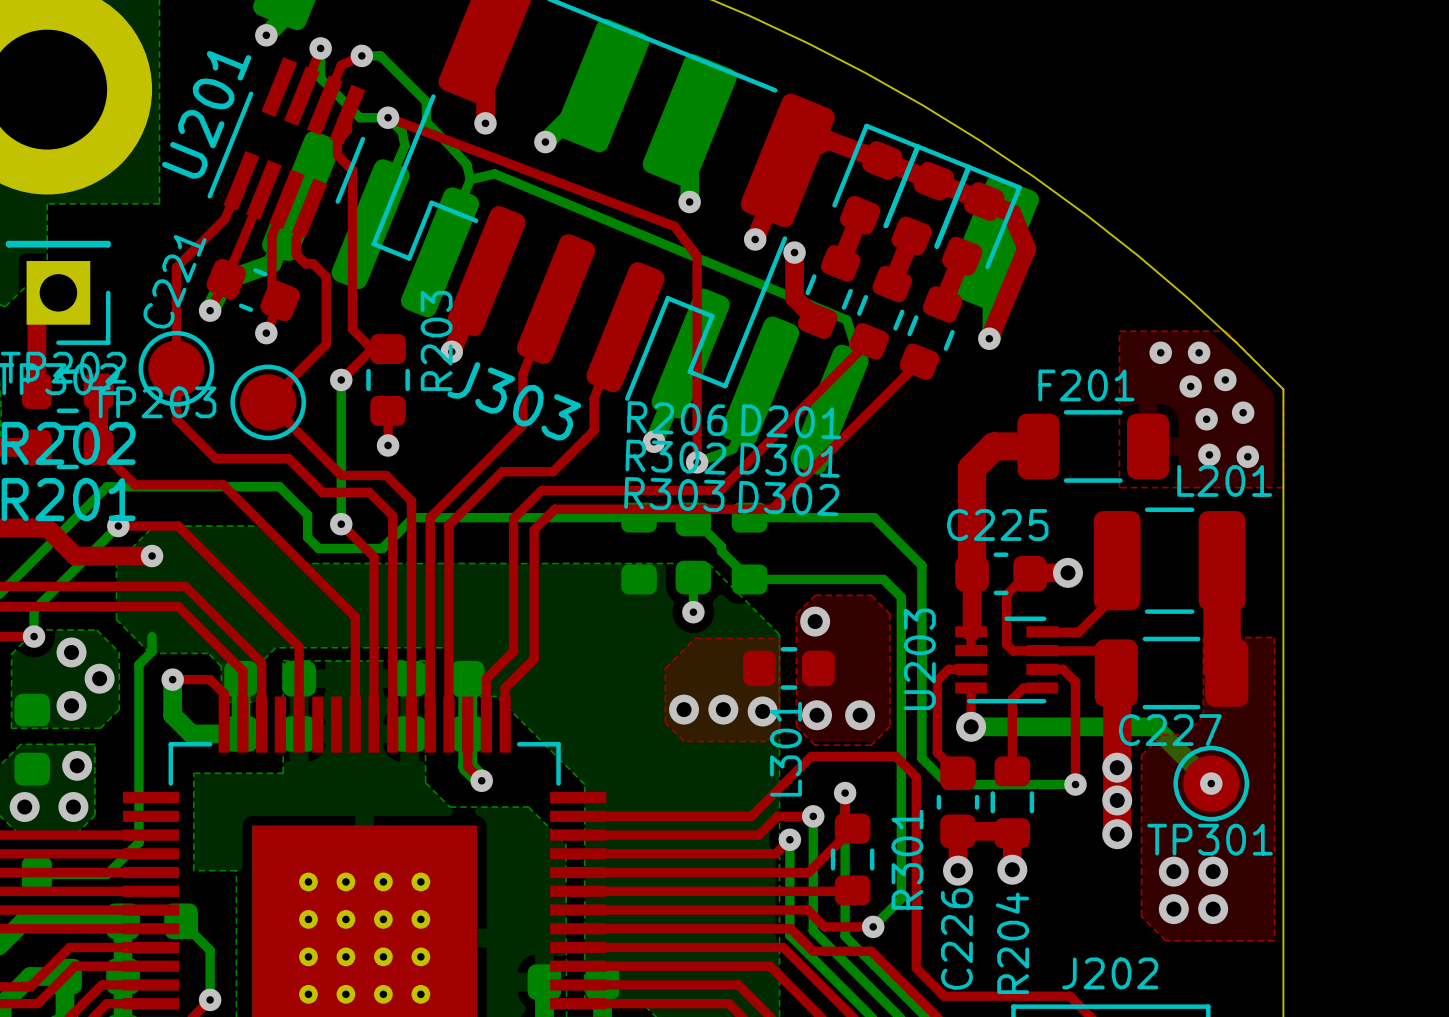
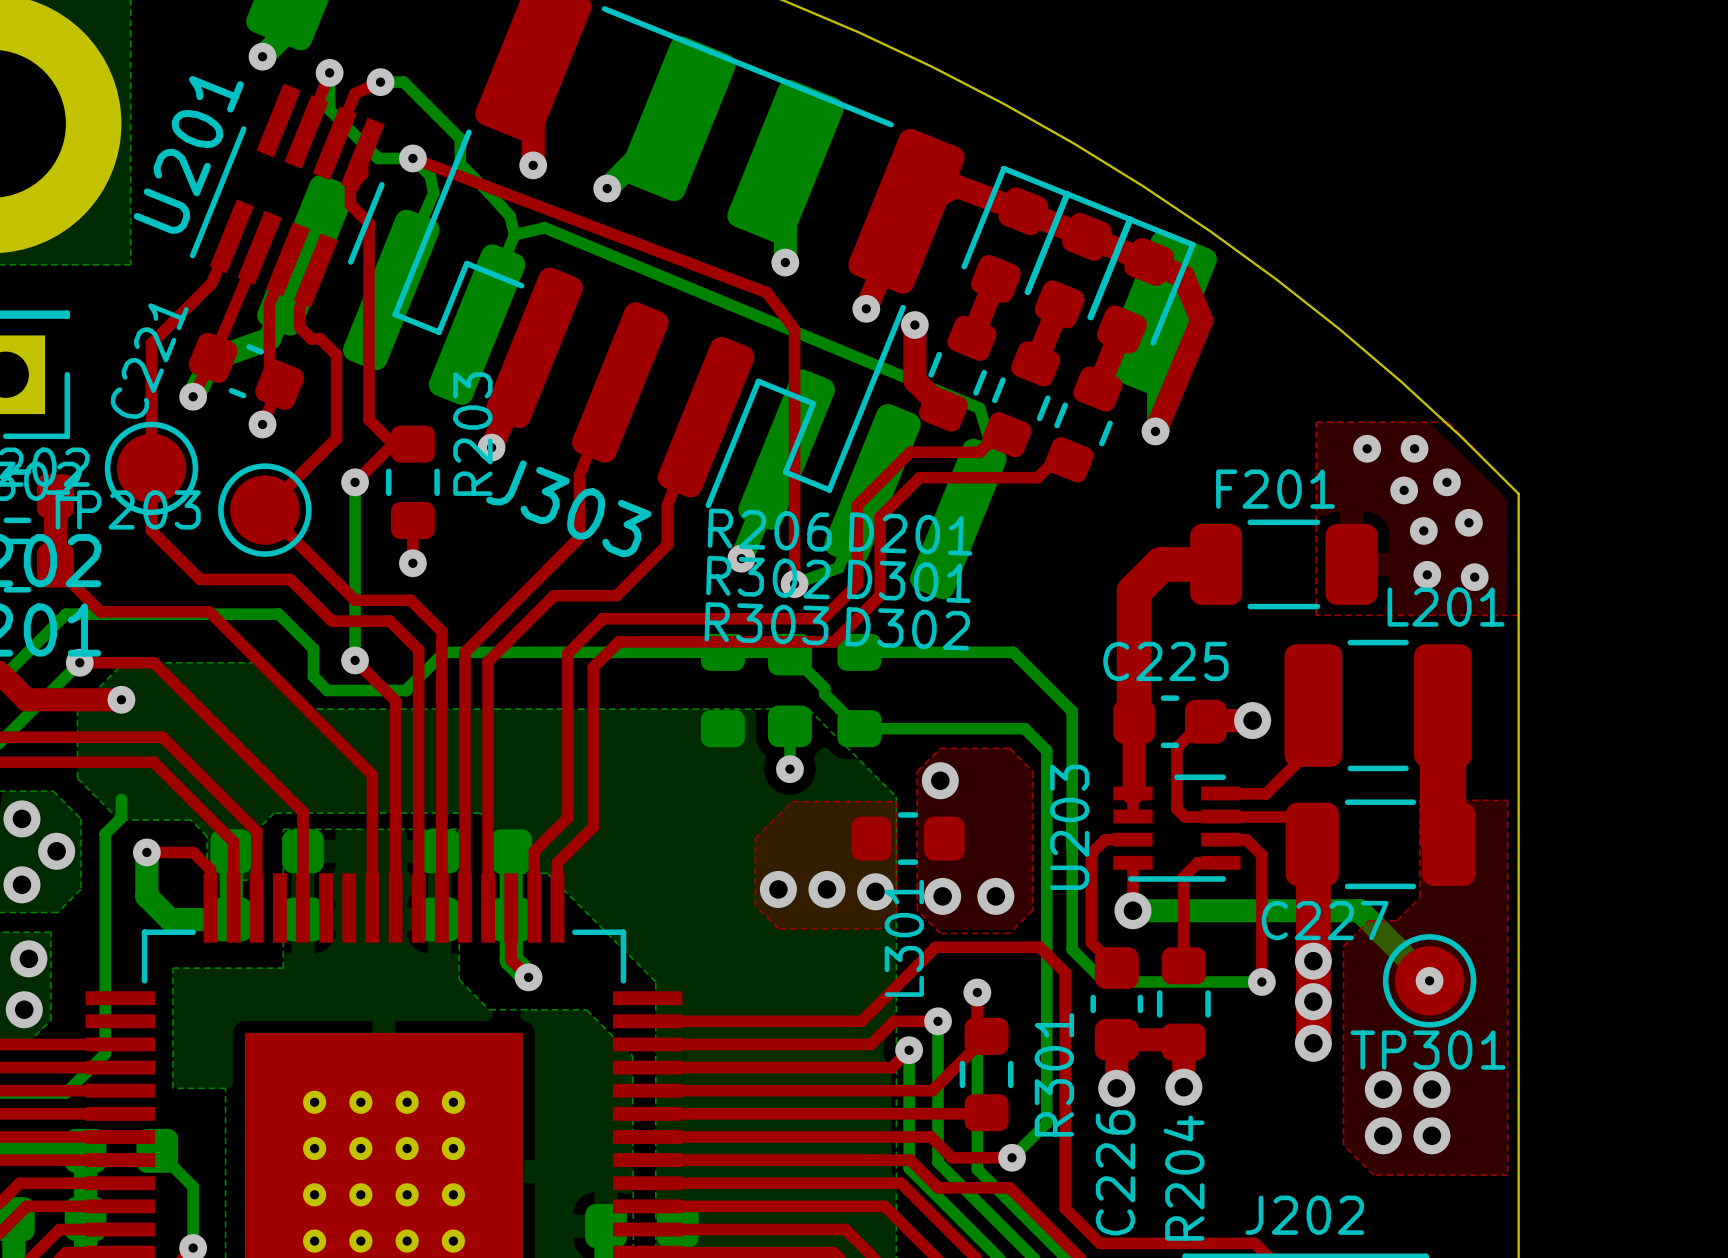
top track: (862, 348) (747, 462) -> (998, 442) (988, 442) (979, 452) (910, 452) (857, 505) (857, 584)
top track: (919, 361) (772, 509) (728, 509) -> (1069, 459) (1055, 459) (1037, 477) (919, 477) (880, 517) (880, 595) (833, 641)
C227 name position: C227 (1170, 730) -> C227 (1325, 920)

